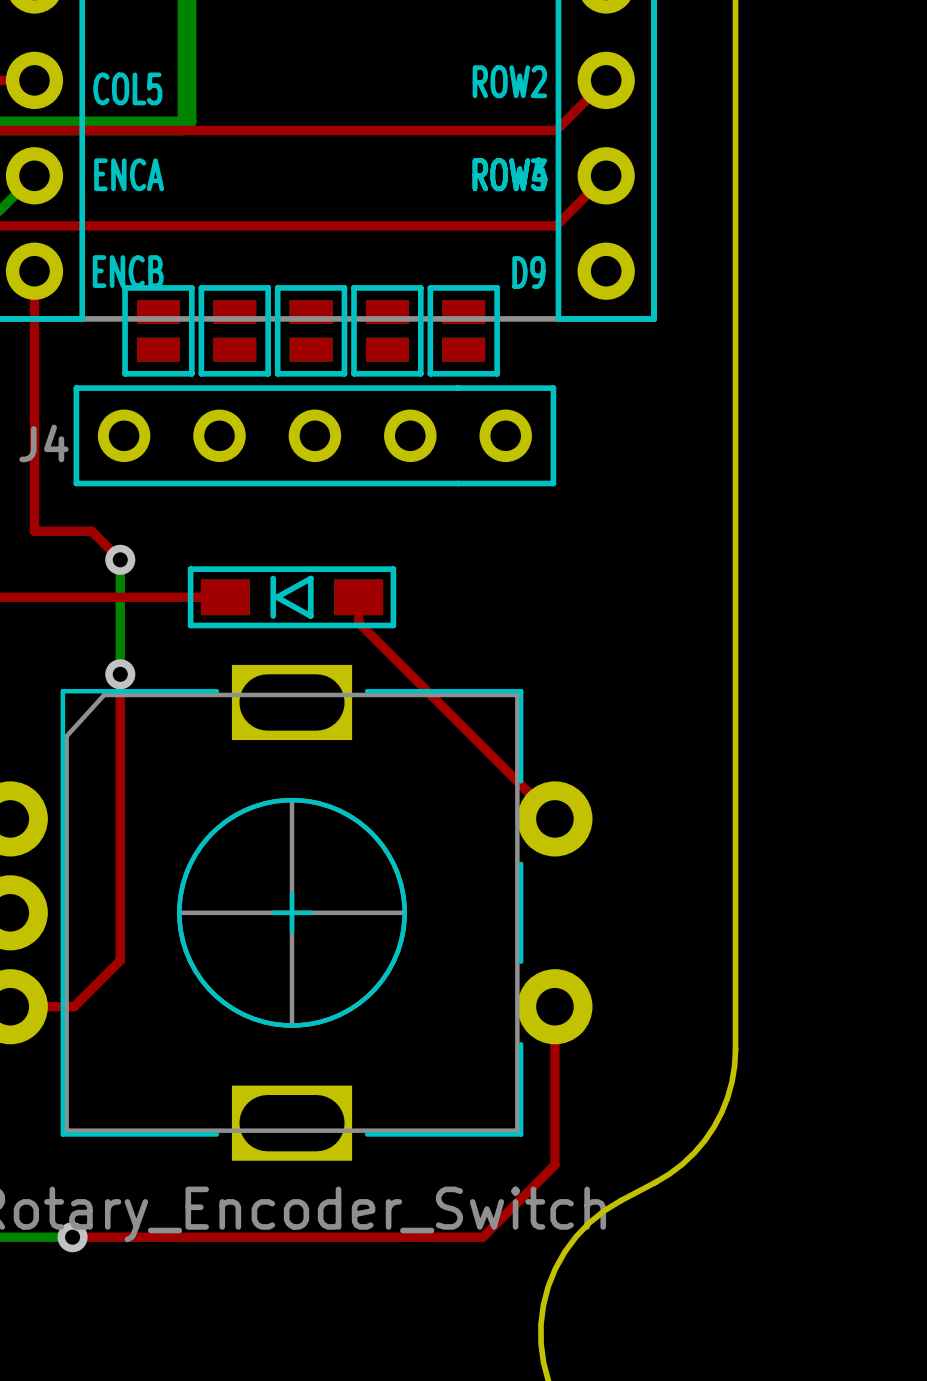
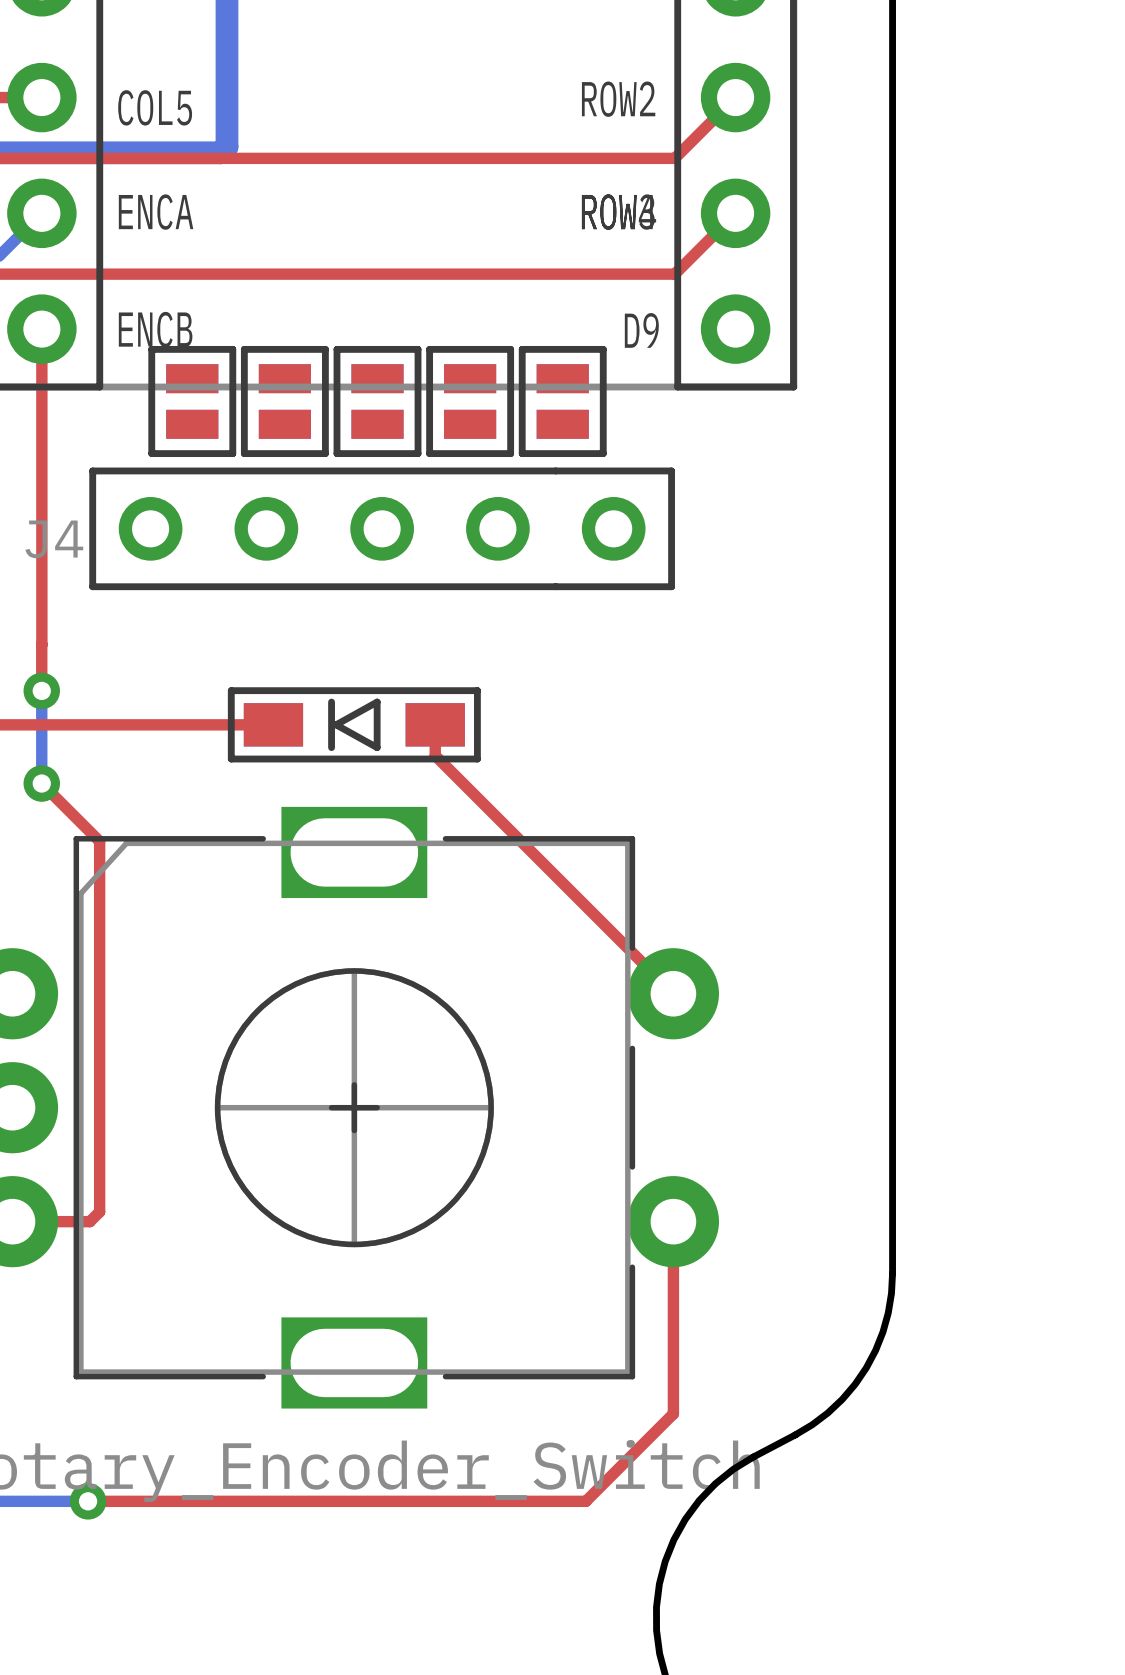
top track: (34, 531) (91, 531) (120, 559) -> (41, 644) (41, 690)
bottom track: (120, 559) (120, 674) -> none
via: (120, 559) -> none
bottom track: none -> (41, 690) (41, 783)
via: none -> (41, 690)
via: none -> (41, 783)
top track: (120, 674) (120, 960) (82, 998) -> (41, 783) (99, 841) (99, 1211)
via: (120, 674) -> none

